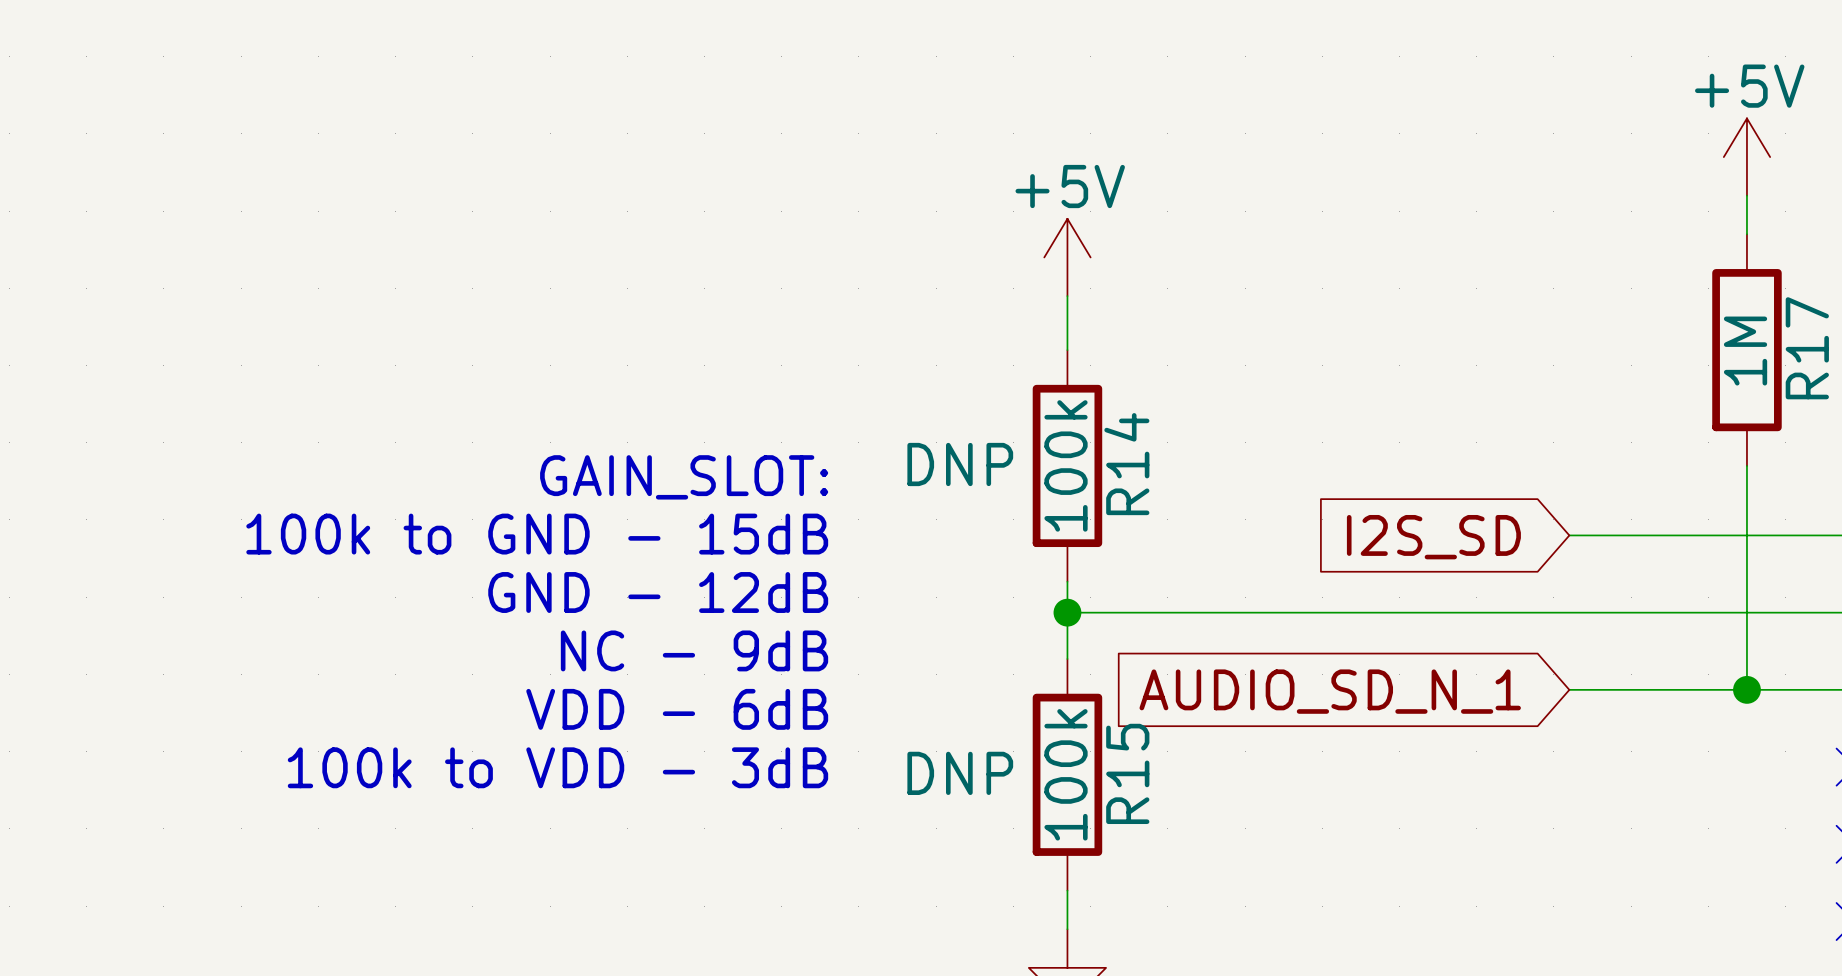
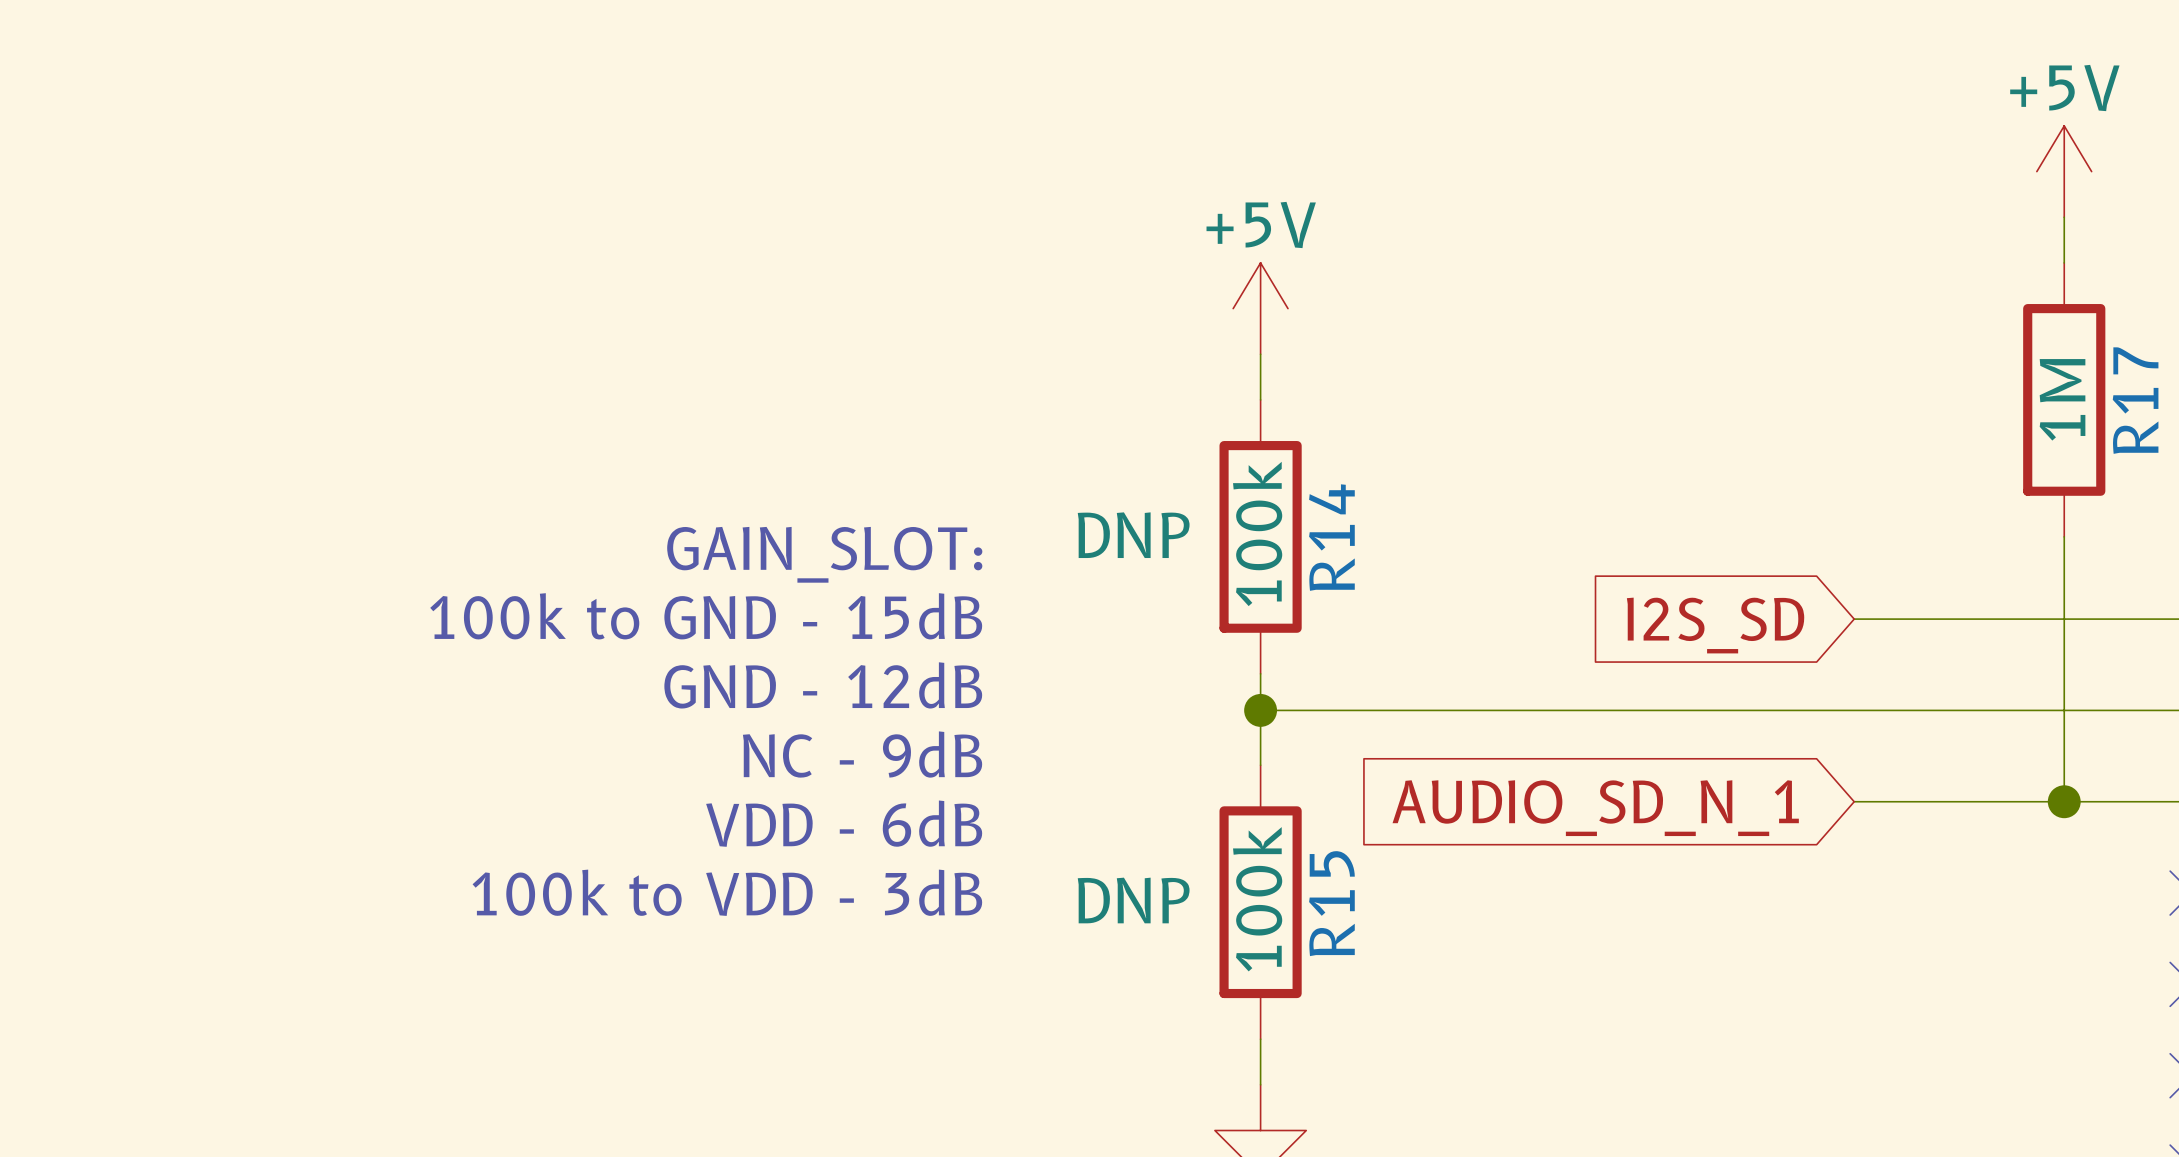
power symbol position: +5V (1067, 257) -> +5V (1260, 308)

